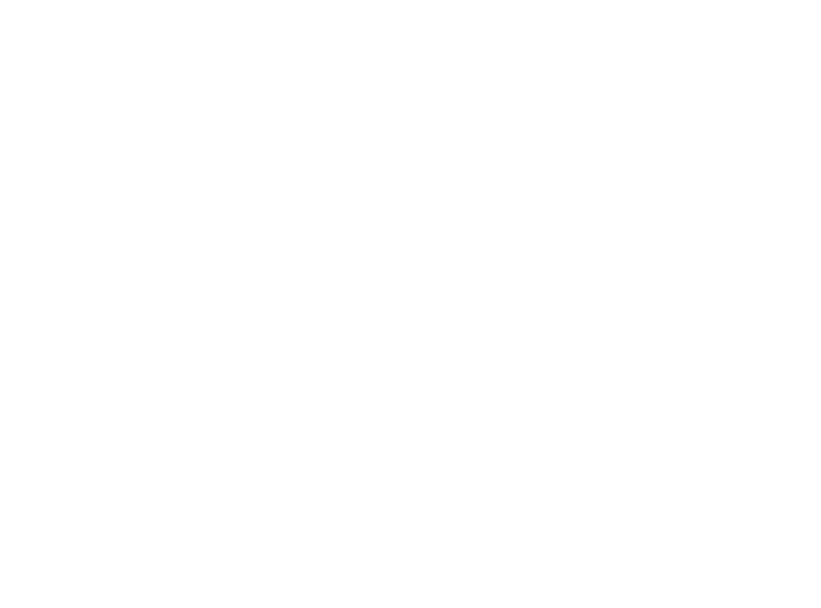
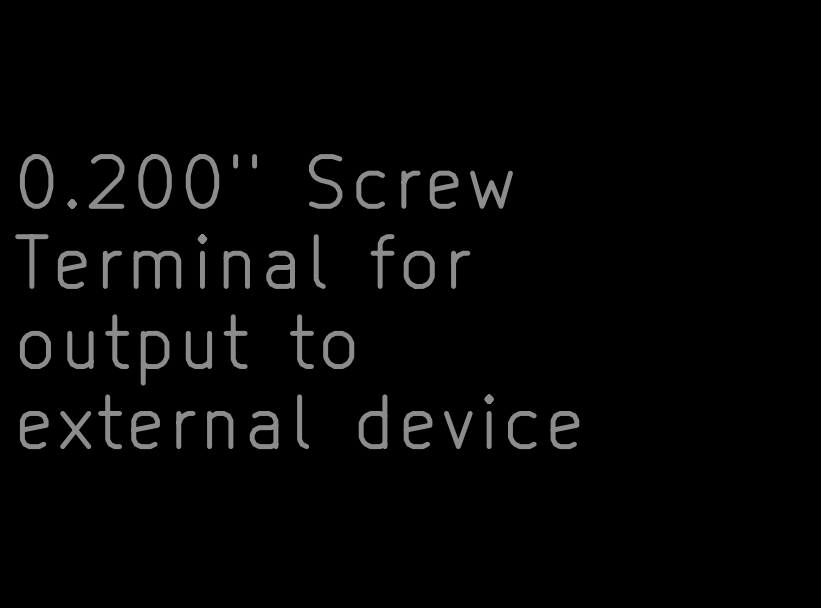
text: none -> 0.200" Screw (266, 181)
text: none -> Terminal for (242, 261)
text: none -> output to (187, 349)
text: none -> external device (299, 421)

